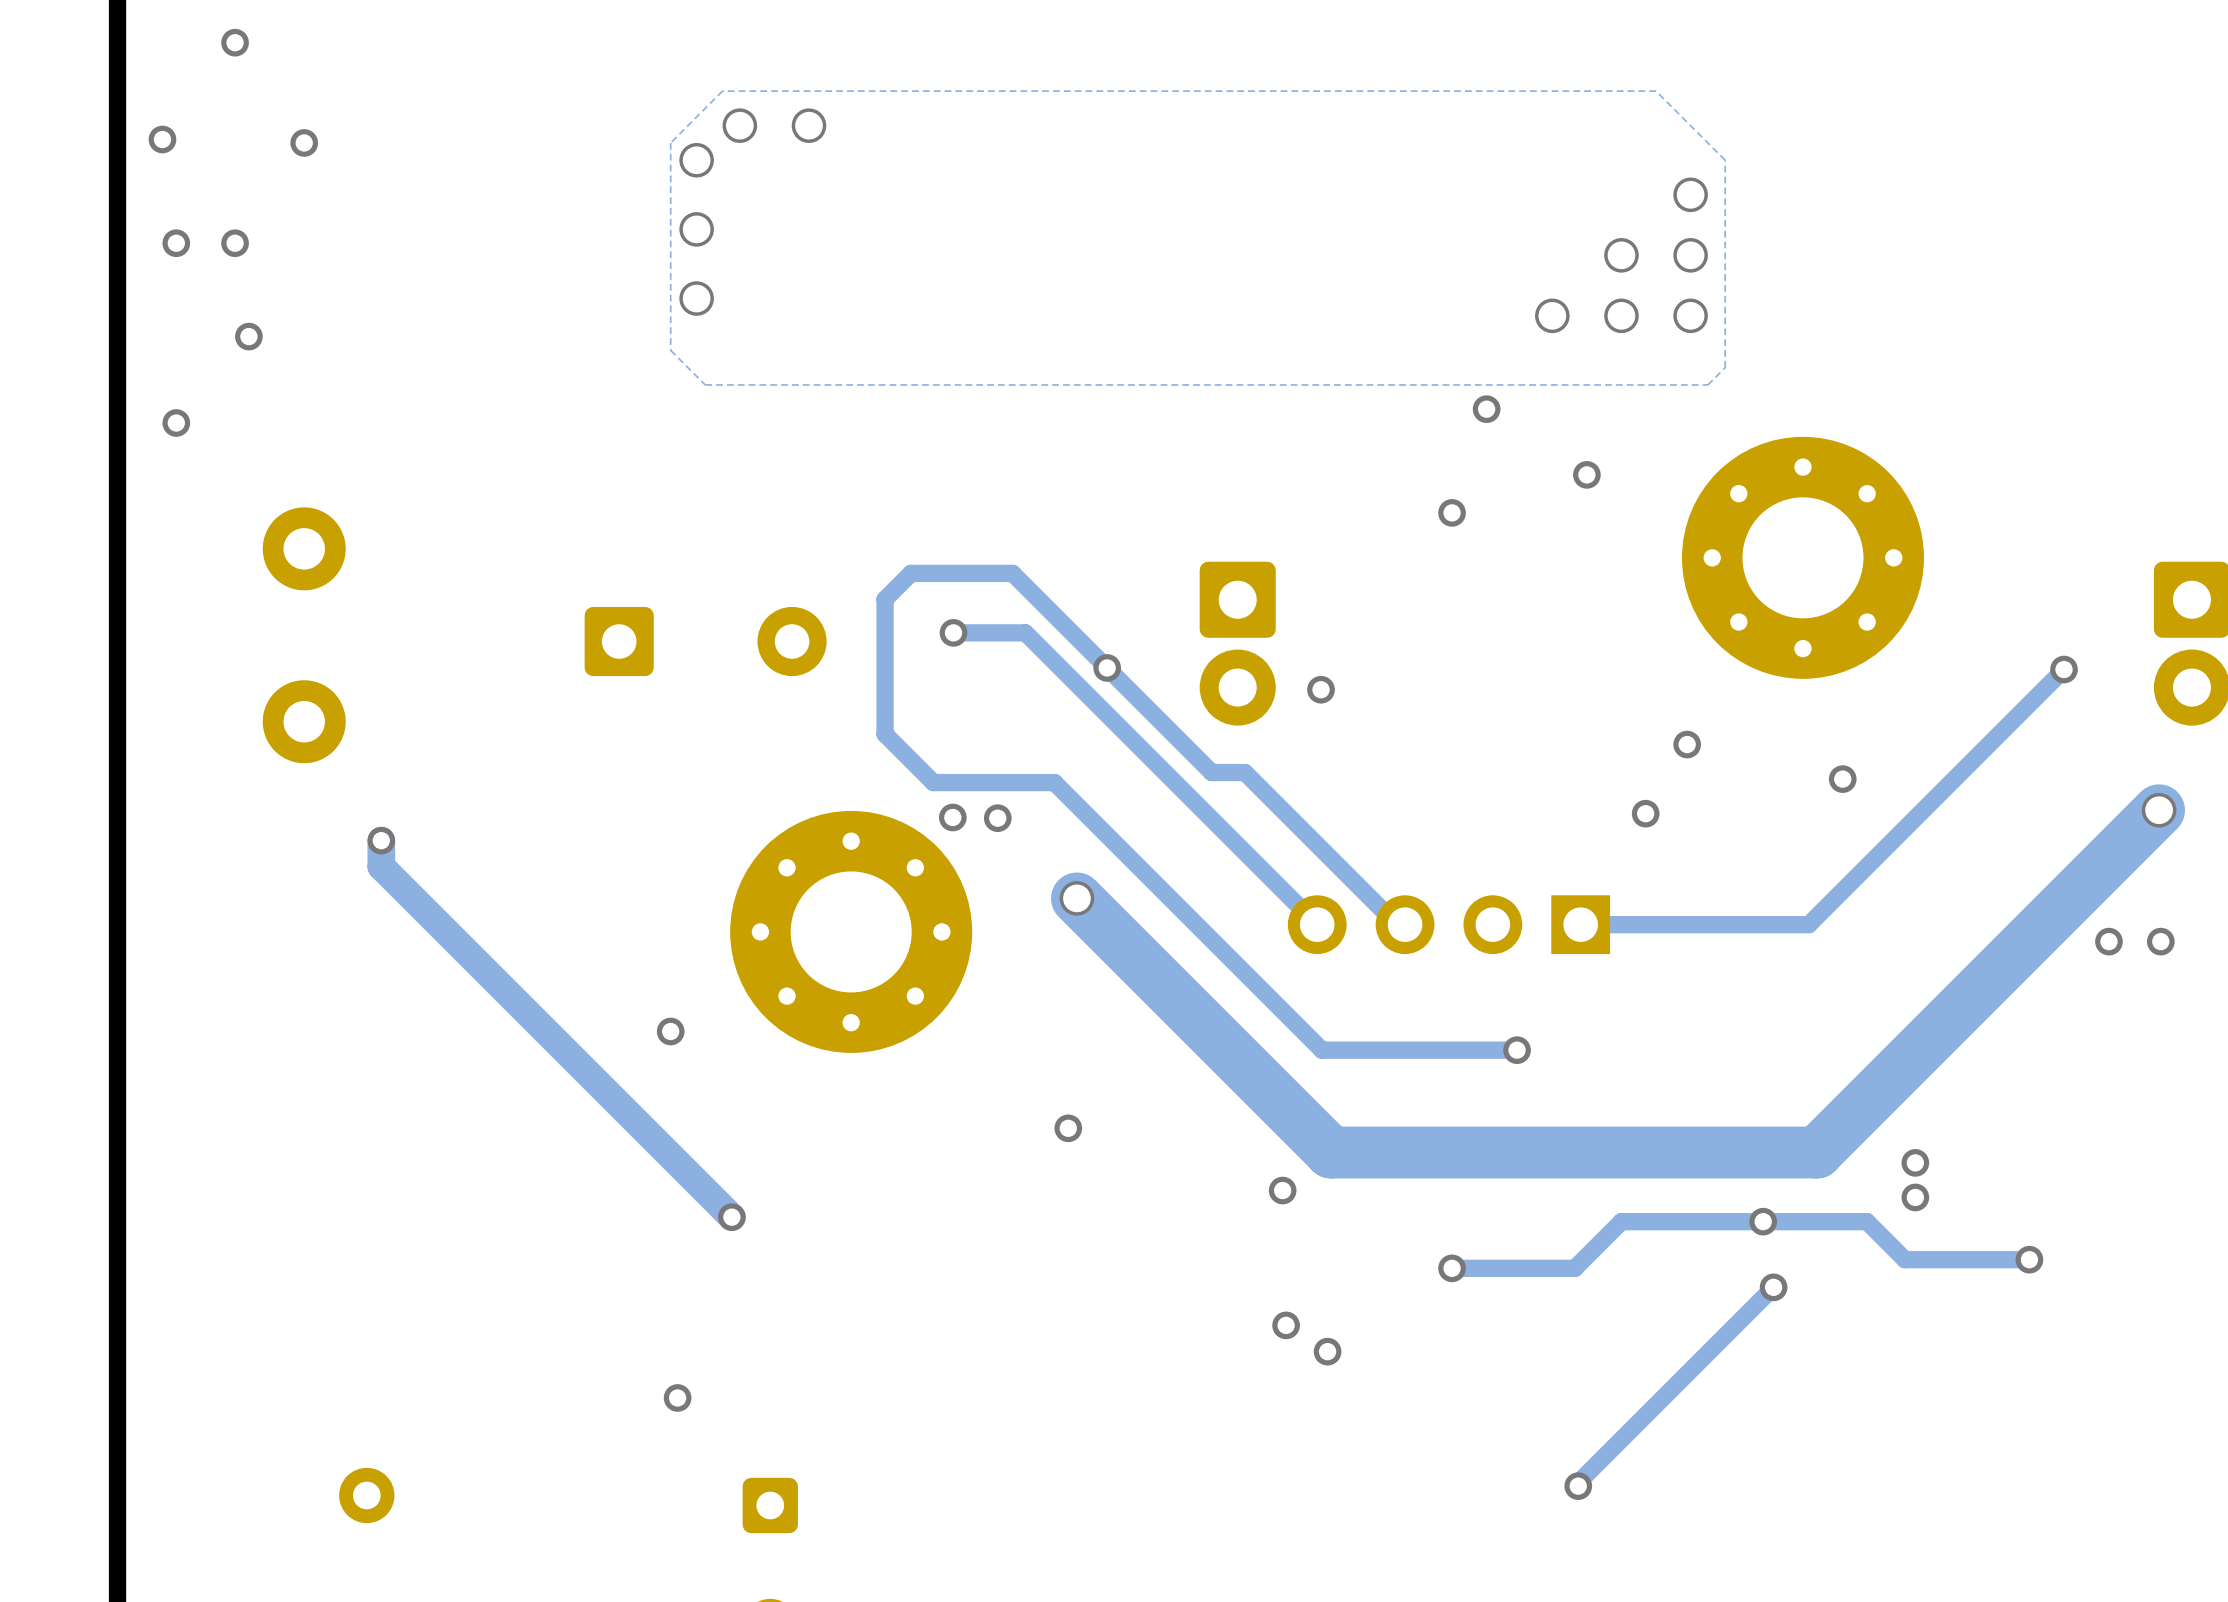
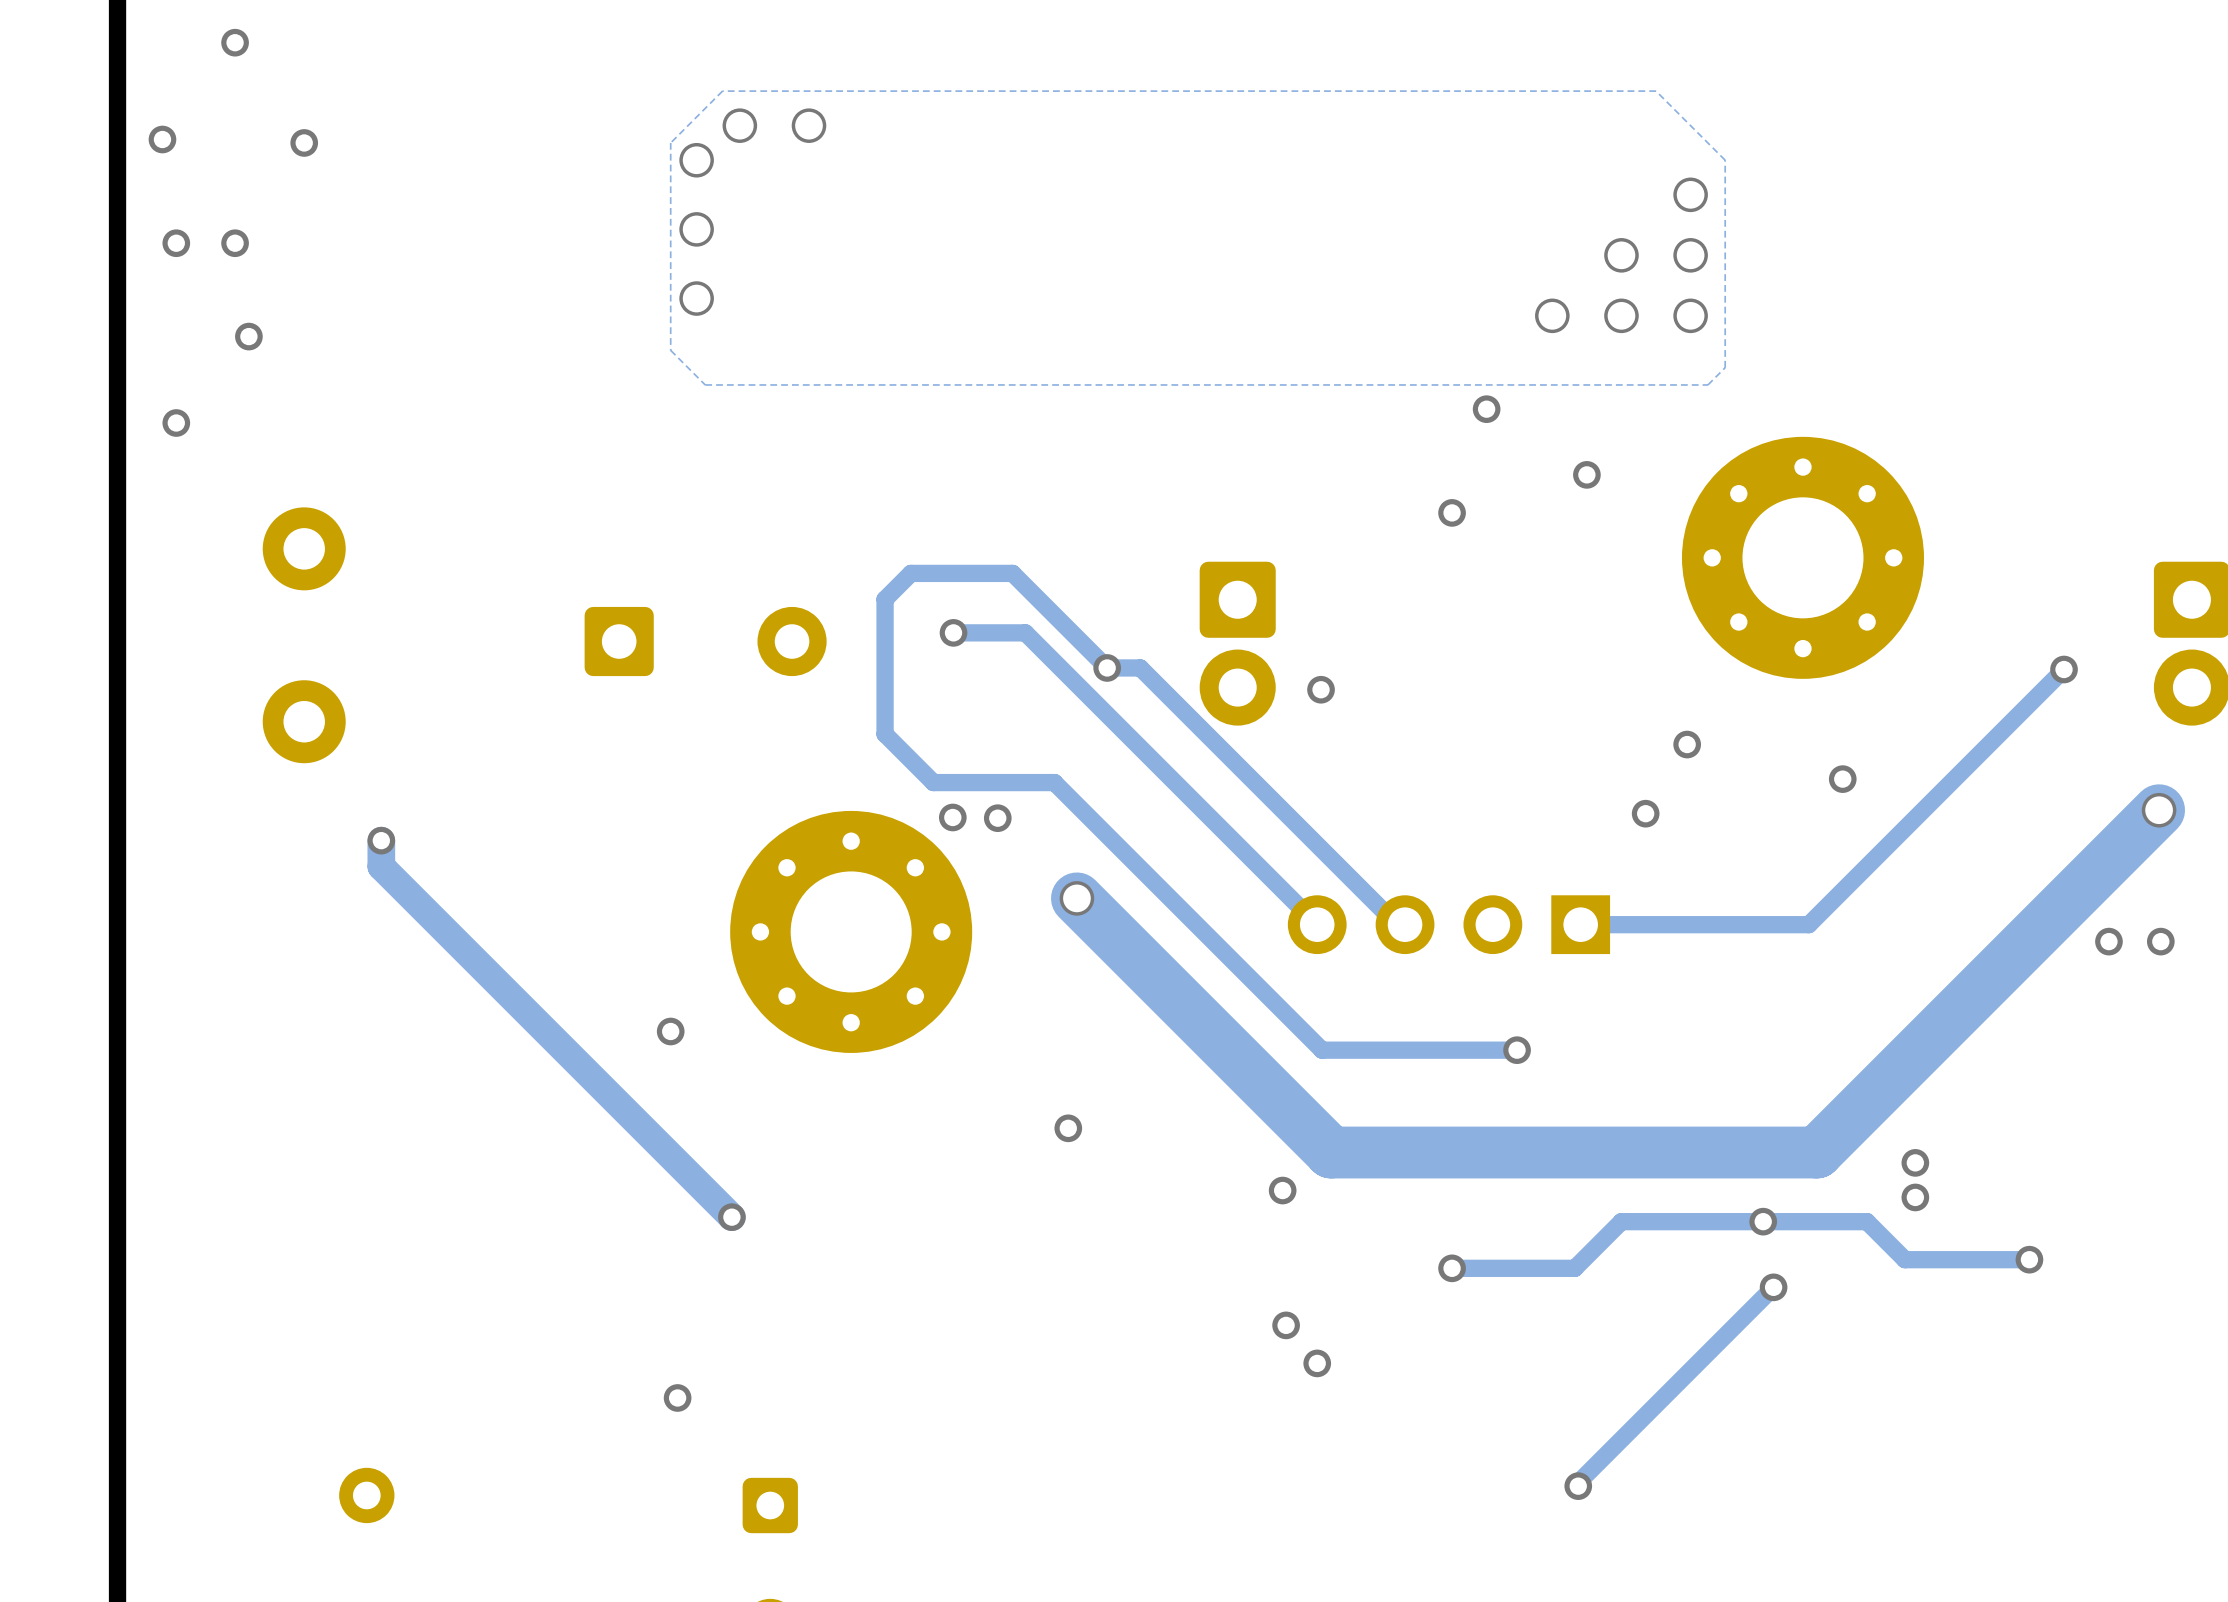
track: (1107, 667) (1211, 772) (1244, 772) -> (1107, 667) (1140, 667) (1244, 772)
via position: (1327, 1351) -> (1317, 1363)

